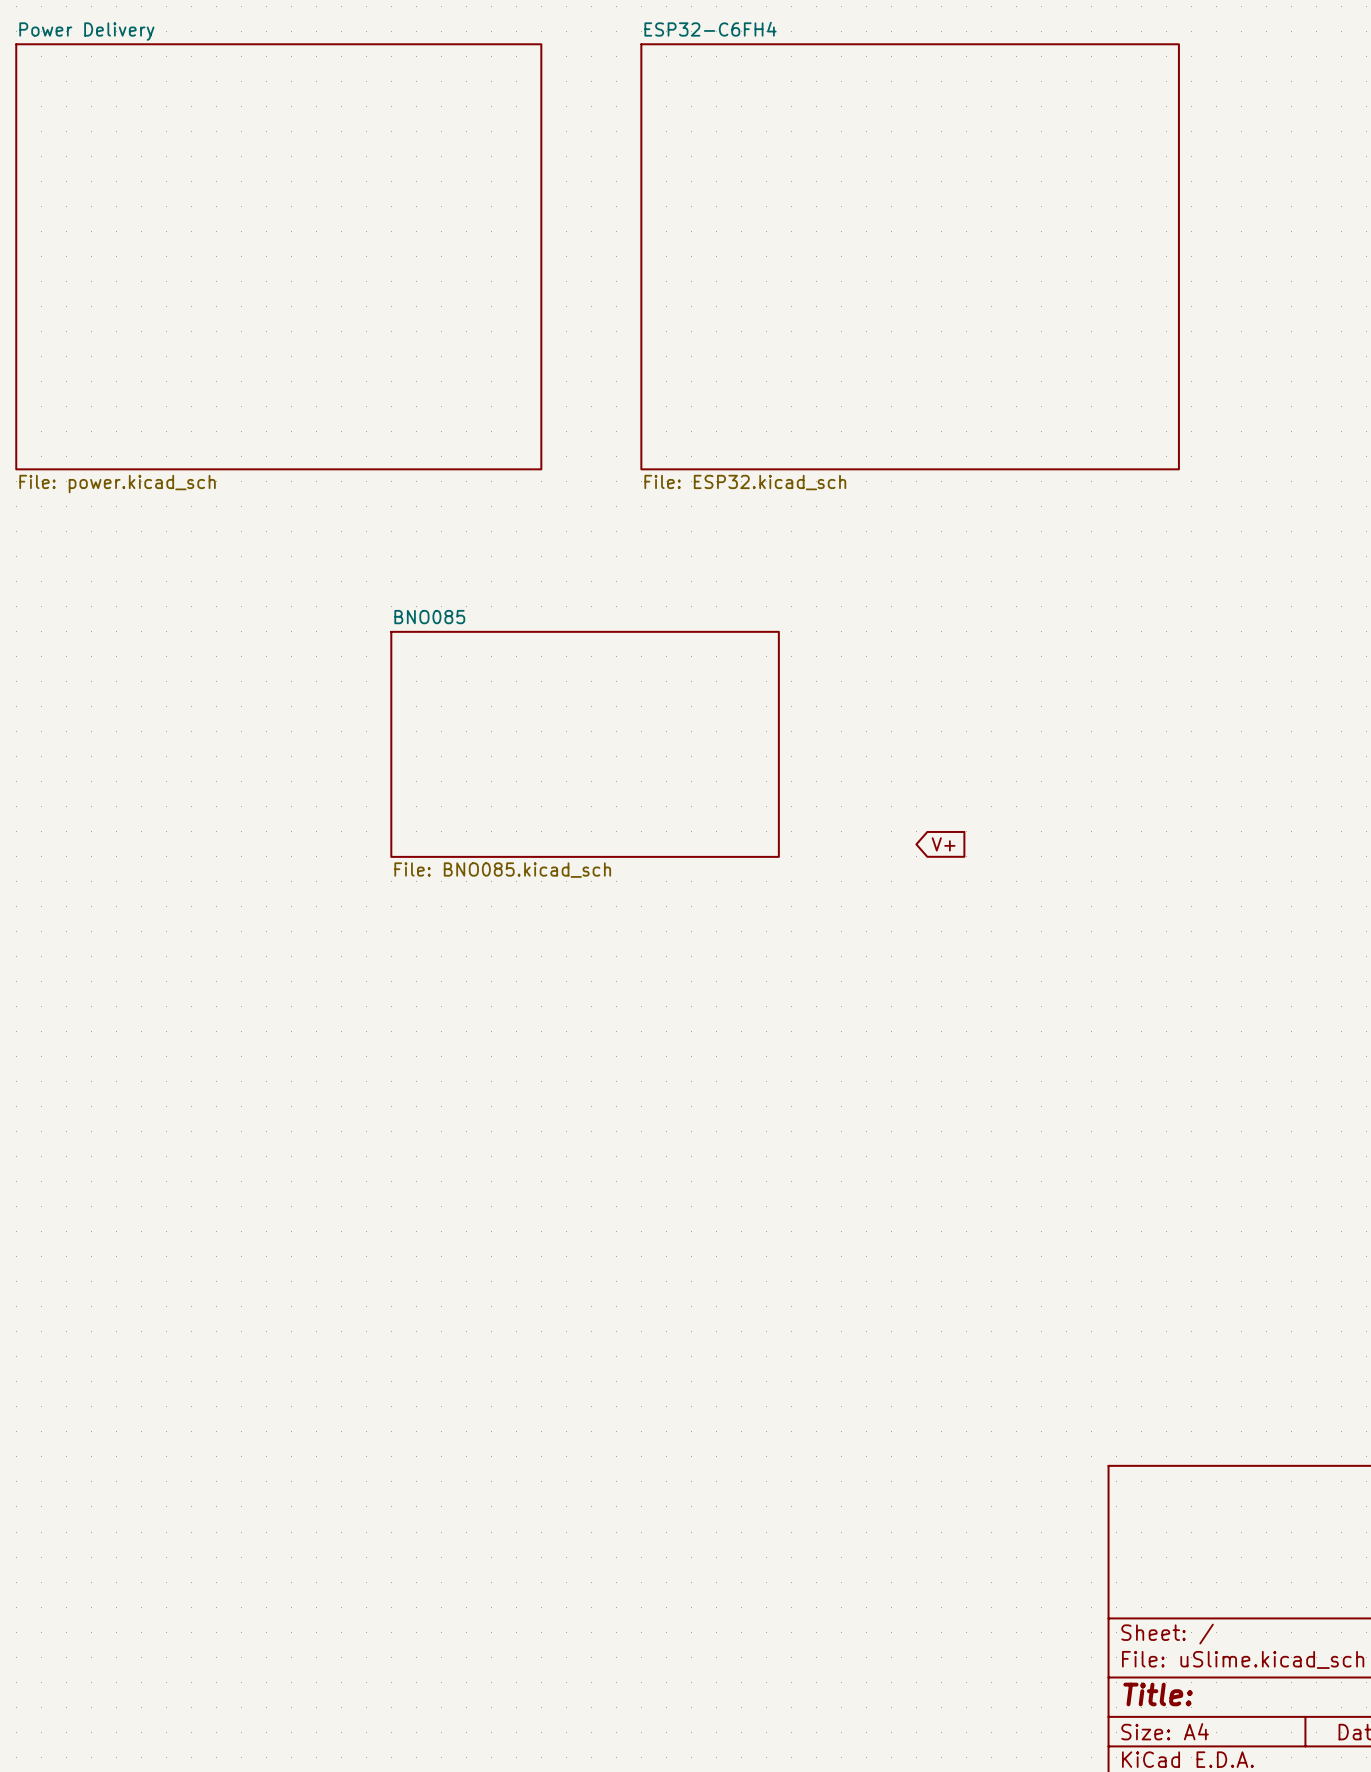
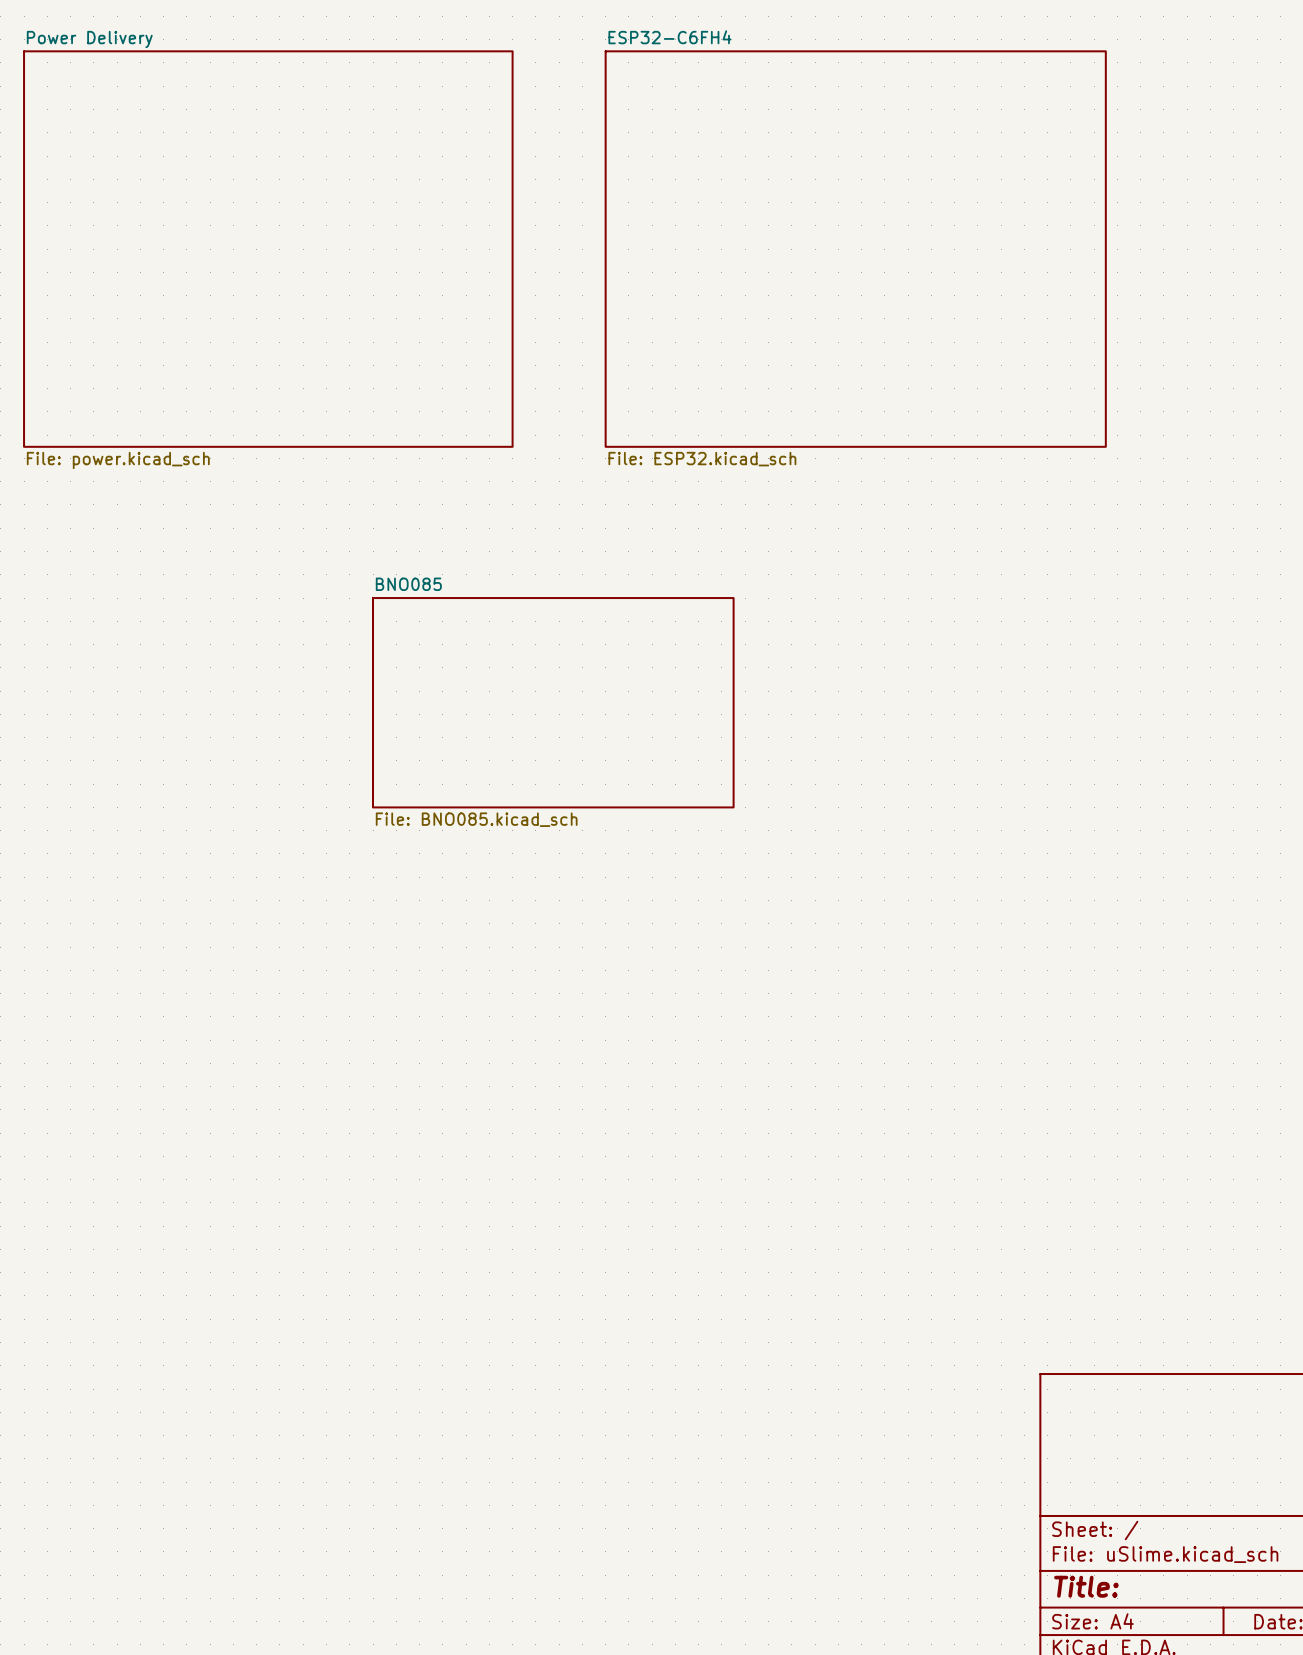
global label: V+ (943, 844) -> none

